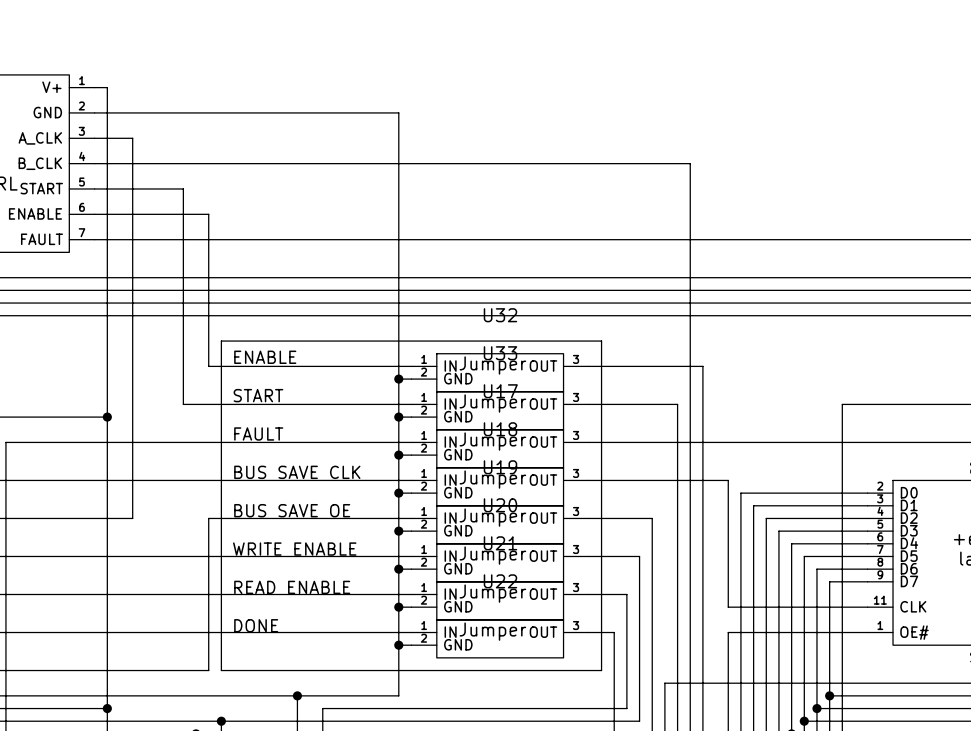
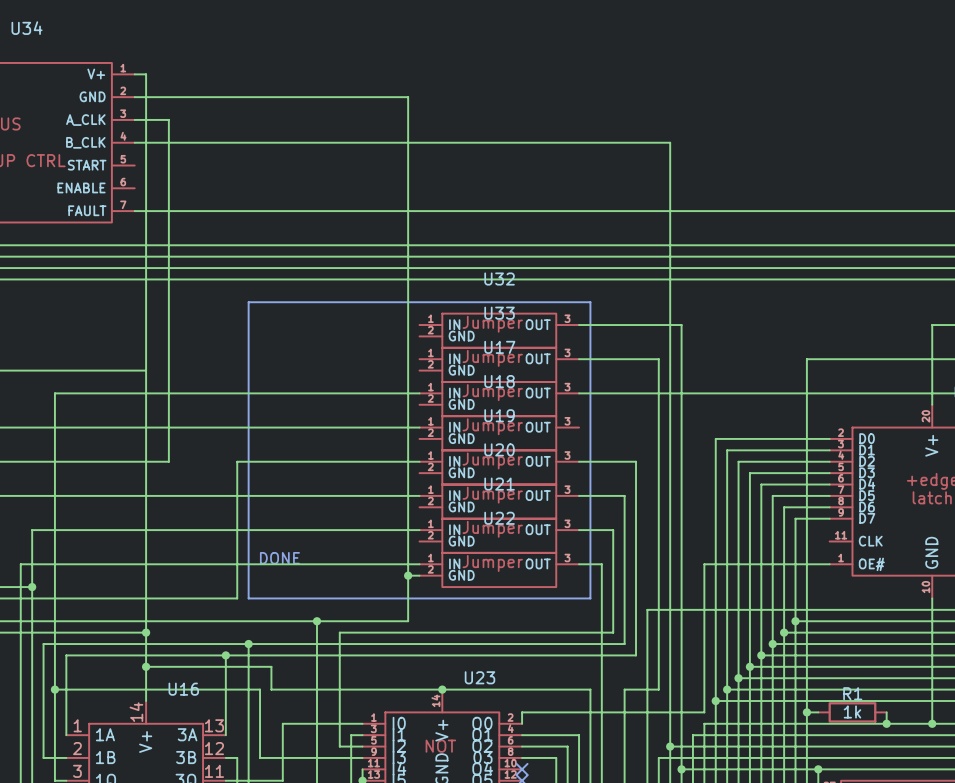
wire: (94, 188) (183, 188) (183, 404) (411, 404) -> none
wire: (94, 214) (208, 214) (208, 366) (411, 366) -> none
text: ENABLE (265, 357) -> none
wire: (398, 379) (411, 379) -> none
junction: (398, 379) -> none
text: START (258, 395) -> none
junction: (107, 417) -> none
wire: (398, 417) (411, 417) -> none
junction: (398, 417) -> none
text: FAULT (258, 433) -> none
wire: (398, 455) (411, 455) -> none
junction: (398, 455) -> none
text: BUS SAVE CLK (297, 472) -> none
wire: (588, 480) (728, 480) (728, 607) (867, 607) -> none
wire: (398, 493) (411, 493) -> none
junction: (398, 493) -> none
text: BUS SAVE OE (292, 510) -> none
wire: (398, 531) (411, 531) -> none
junction: (398, 531) -> none
text: WRITE ENABLE (294, 549) -> none
wire: (398, 569) (411, 569) -> none
junction: (398, 569) -> none
text: READ ENABLE (292, 587) -> none
wire: (398, 607) (411, 607) -> none
junction: (398, 607) -> none

